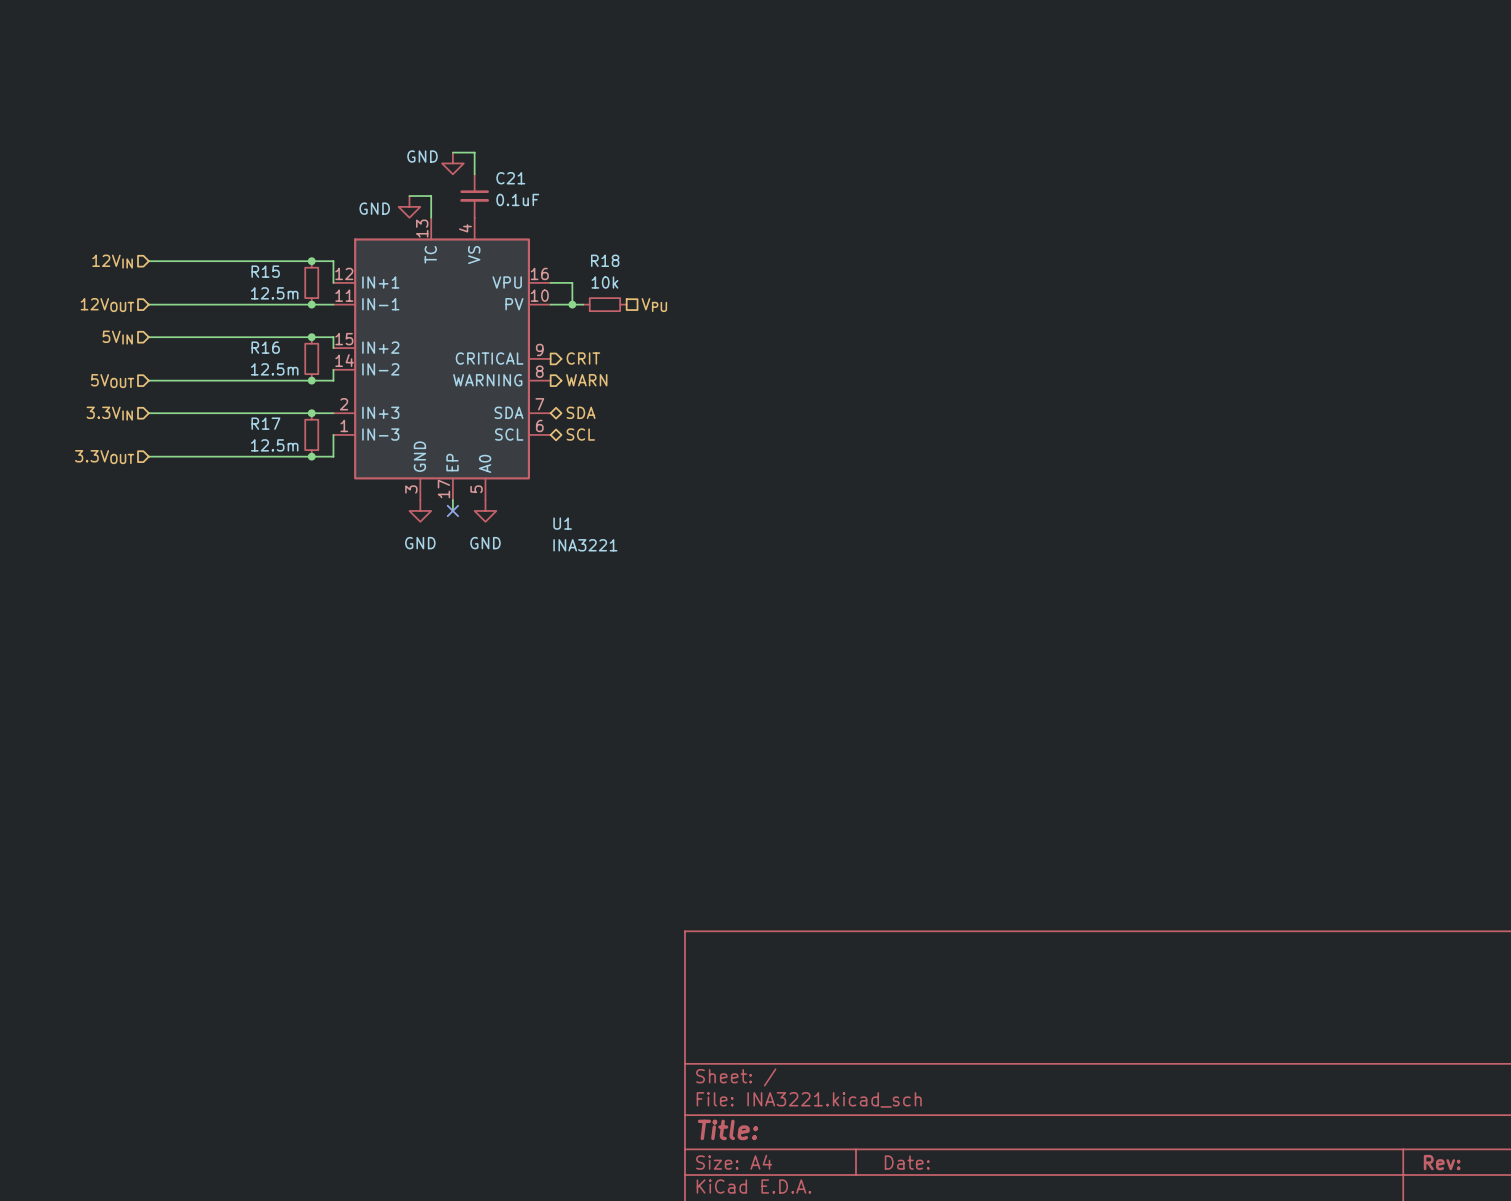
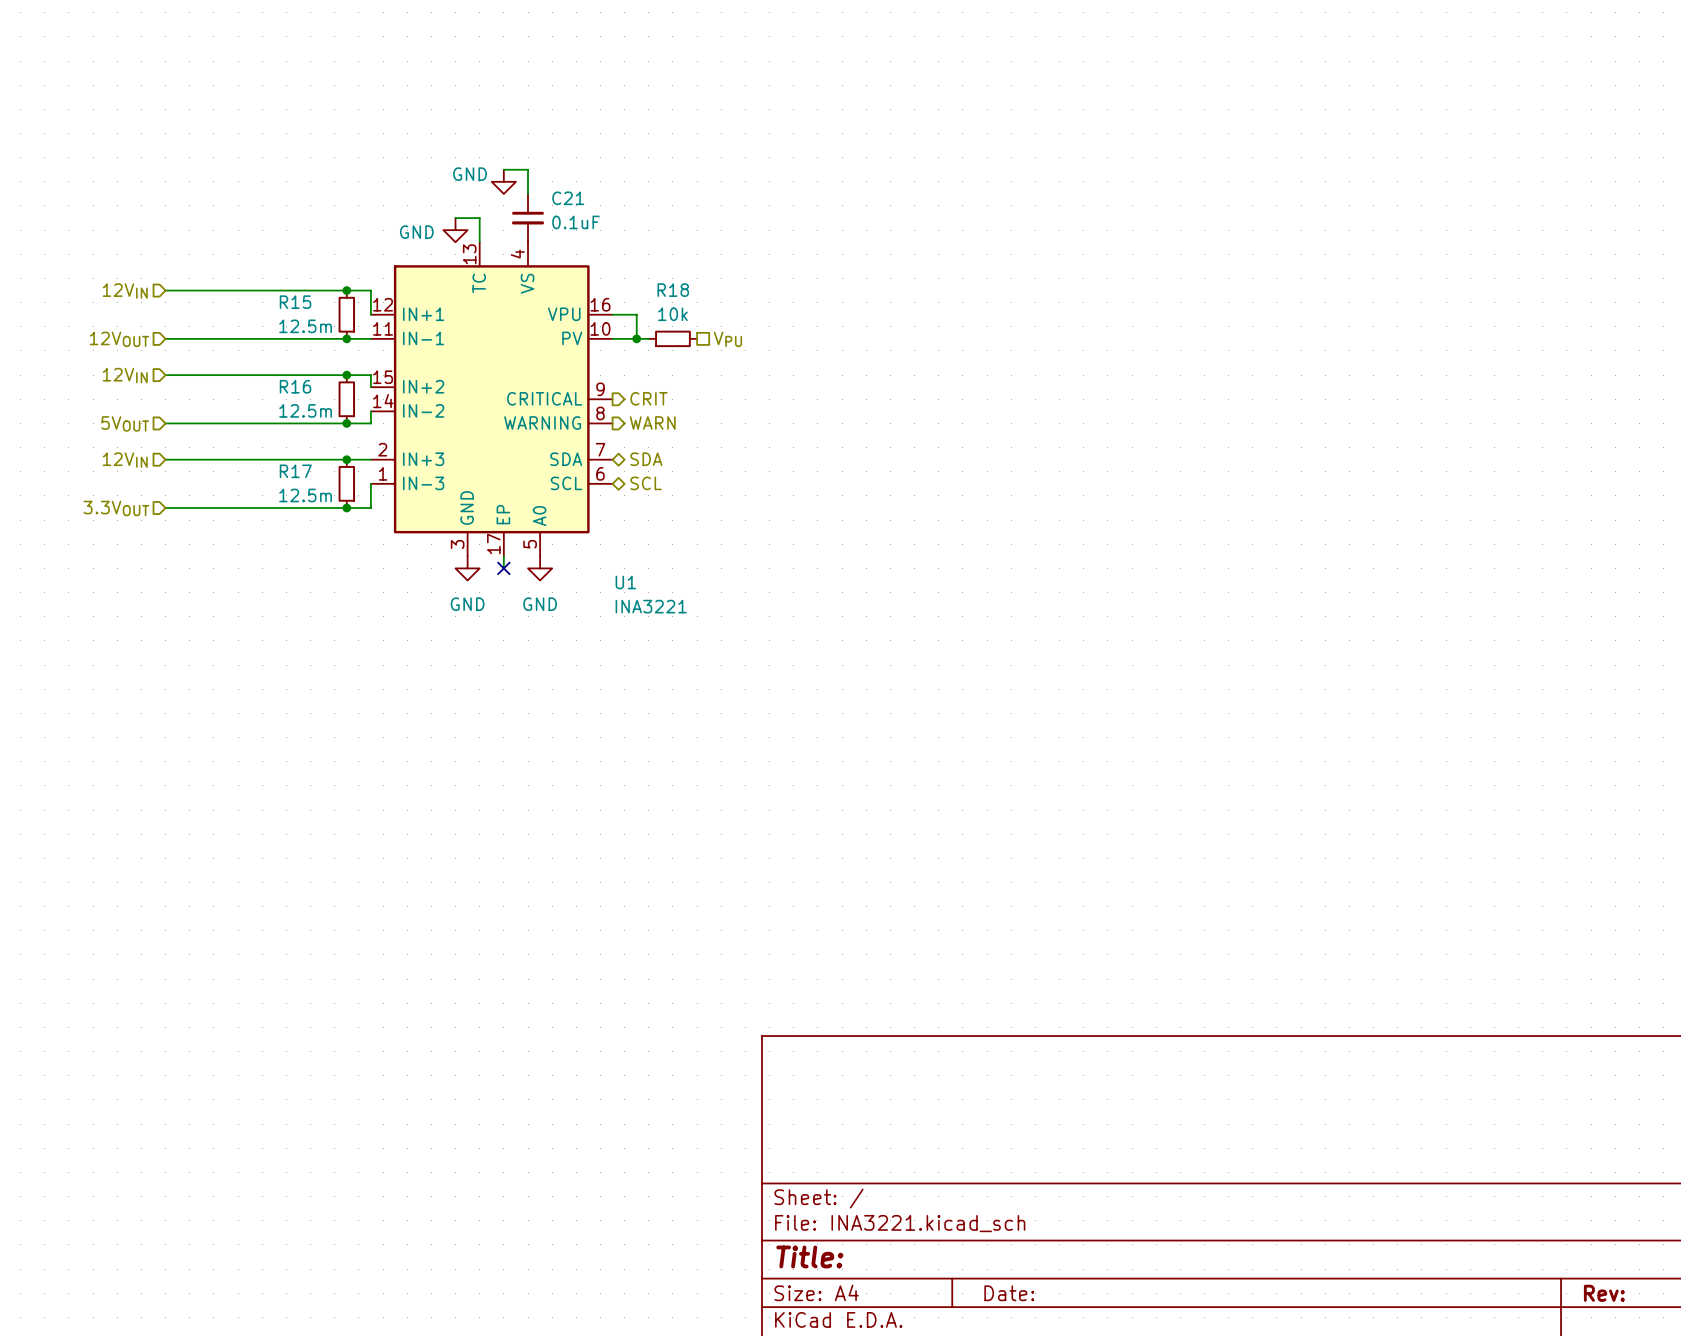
hierarchical label: 5VIN (117, 337) -> 12VIN (125, 375)
hierarchical label: 3.3VIN (109, 413) -> 12VIN (125, 460)

